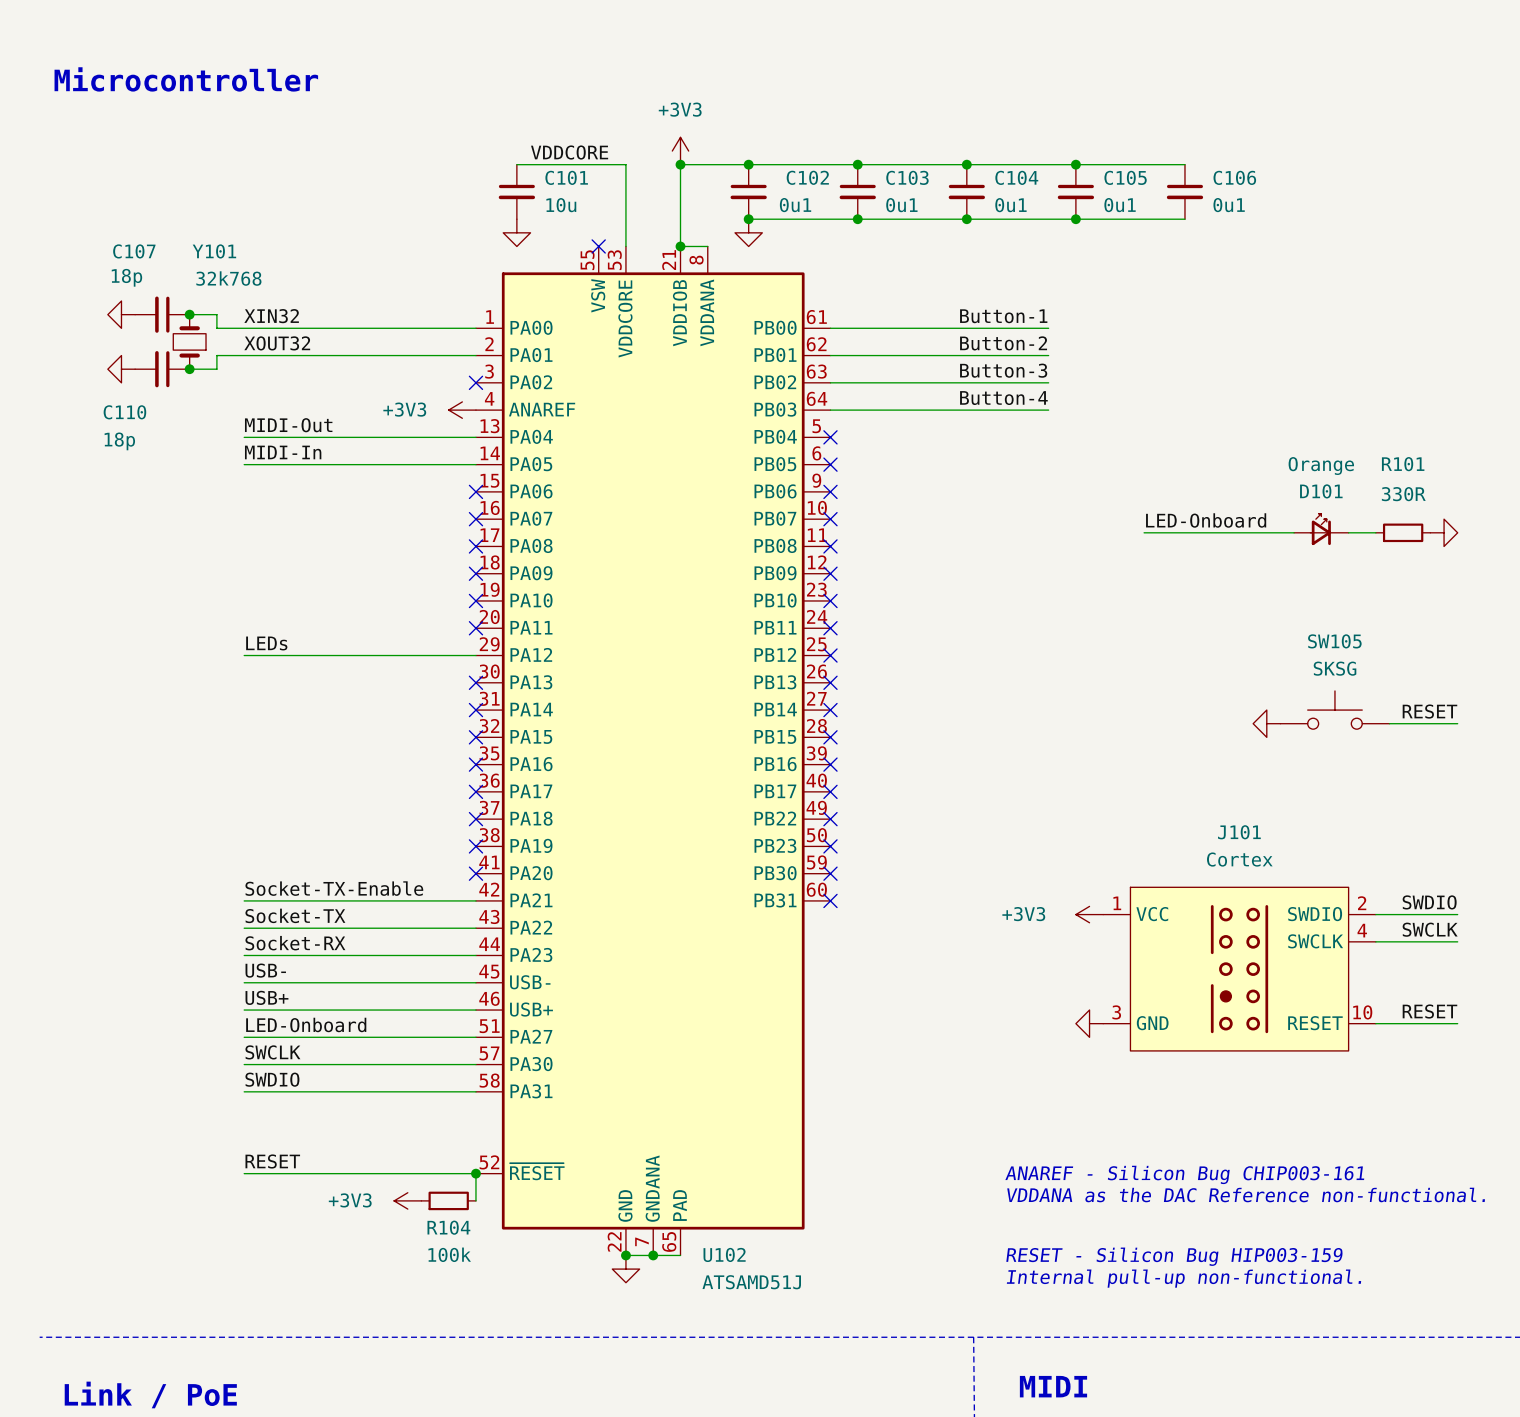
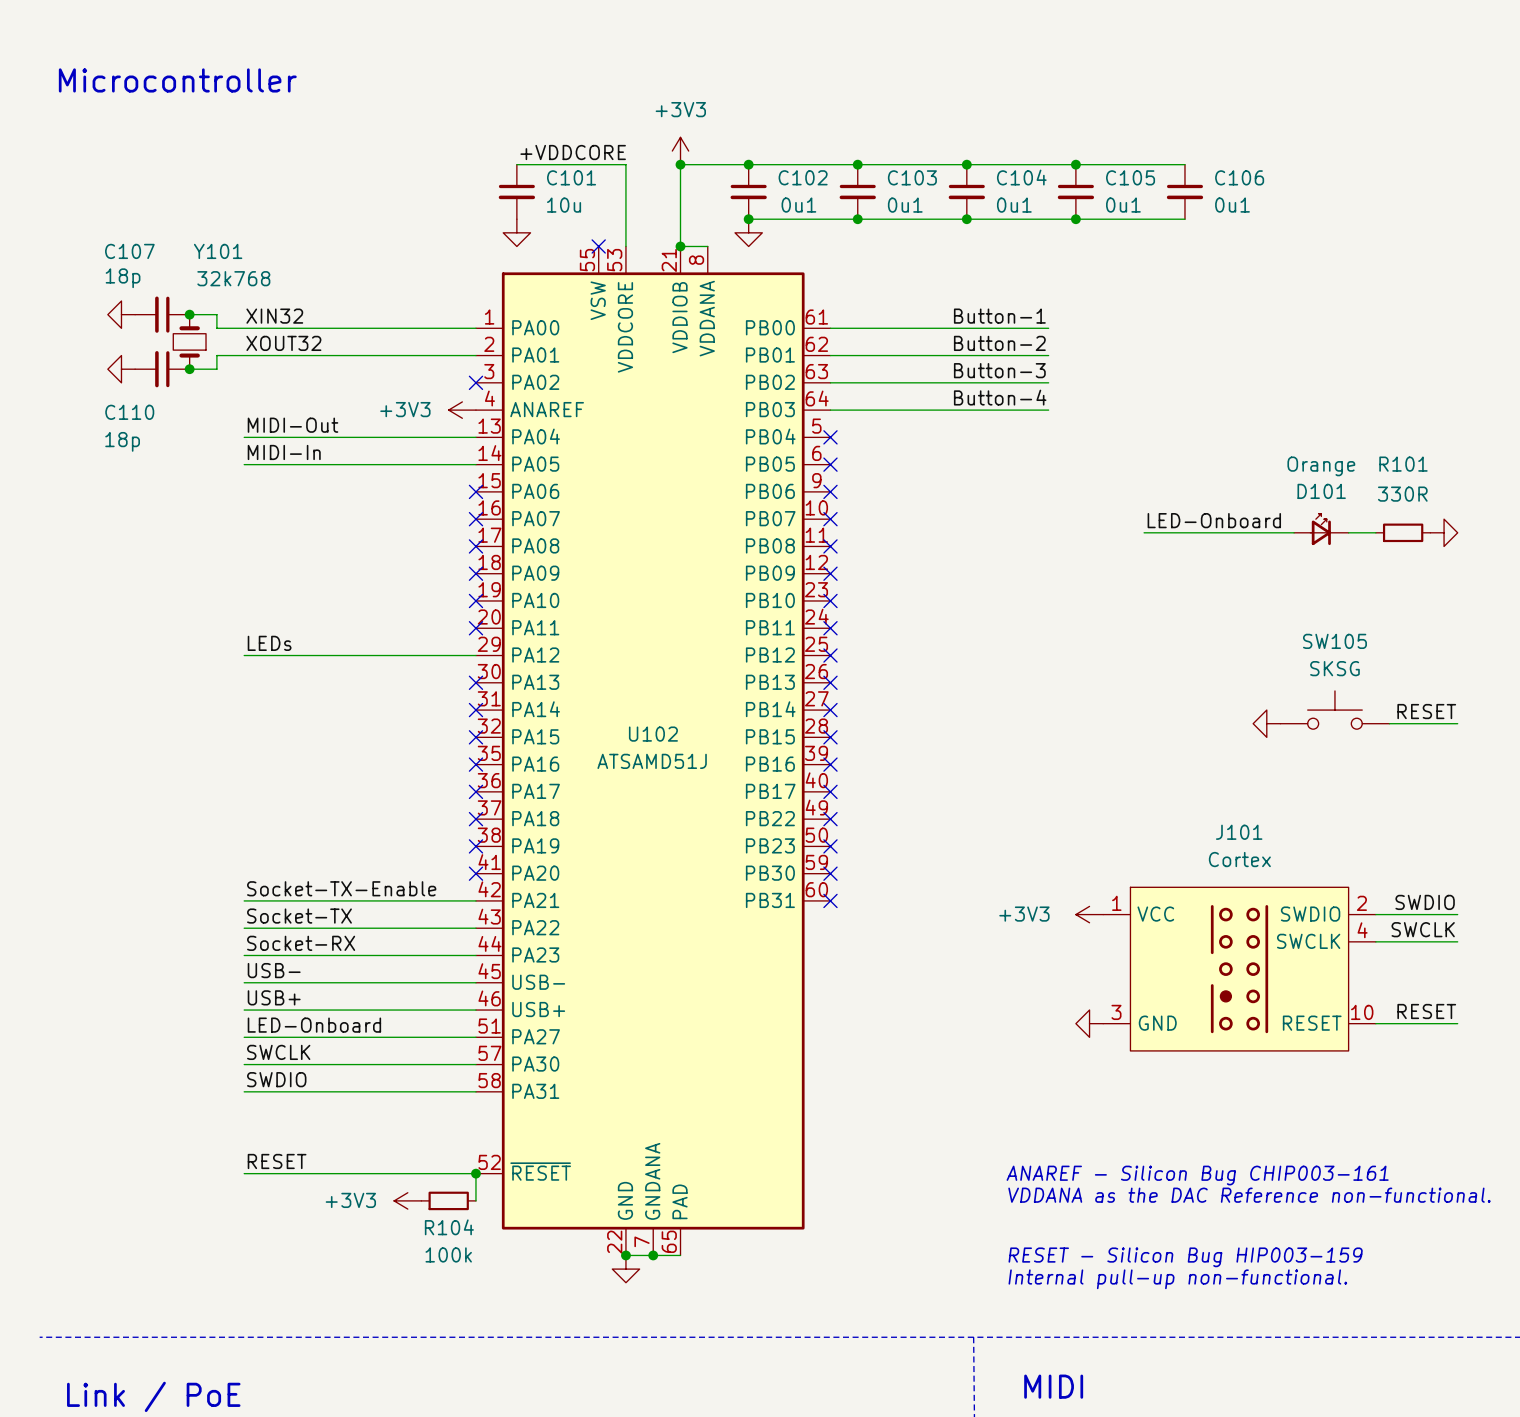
label: VDDCORE (569, 152) -> +VDDCORE (573, 152)
U102 name position: U102 (724, 1254) -> U102 (653, 734)
U102 value position: ATSAMD51J (751, 1282) -> ATSAMD51J (652, 761)

